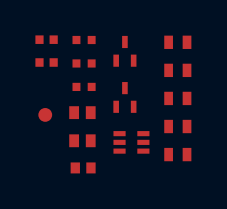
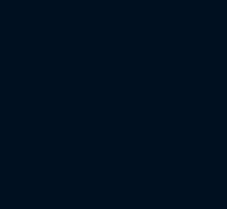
part: (46, 39) -> none
part: (84, 40) -> none
part: (177, 42) -> none
part: (124, 51) -> none
part: (46, 62) -> none
part: (84, 63) -> none
part: (177, 70) -> none
part: (84, 86) -> none
part: (124, 97) -> none
part: (177, 98) -> none
part: (82, 112) -> none
part: (45, 114) -> none
part: (177, 126) -> none
part: (82, 140) -> none
part: (131, 142) -> none
part: (177, 154) -> none
part: (83, 167) -> none

